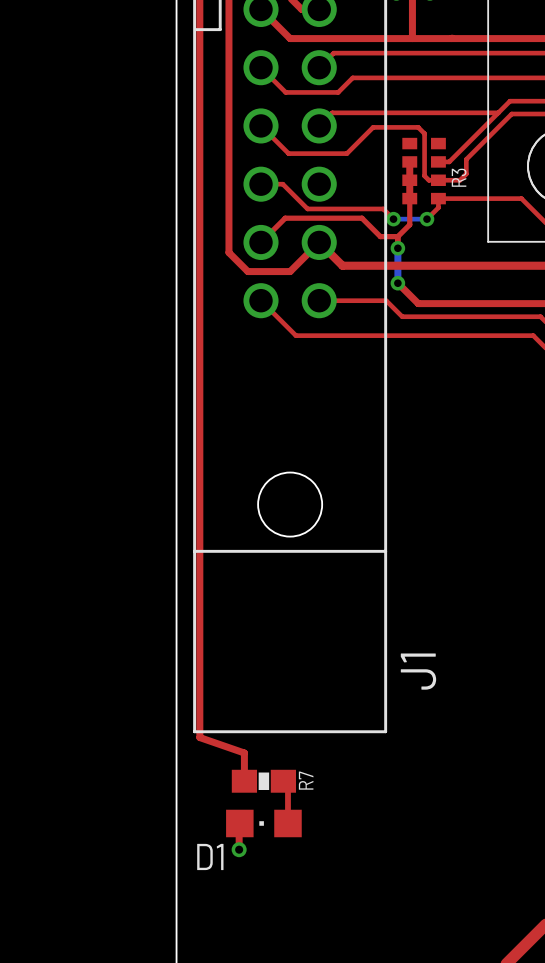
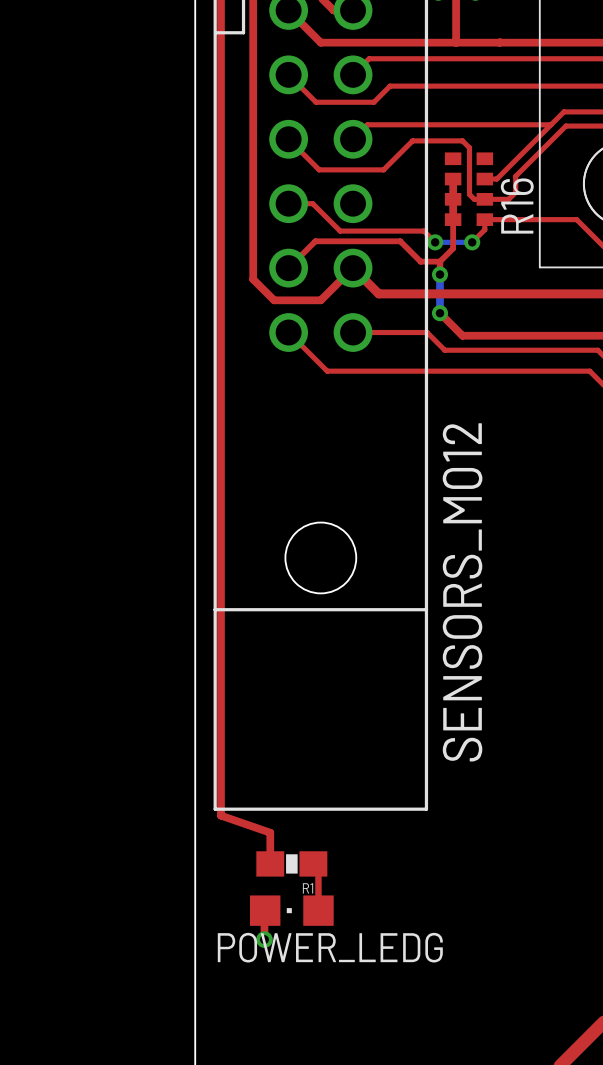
R3 name: R3 (459, 177) -> R16 (517, 206)
J1 name: J1 (418, 671) -> SENSORS_M012 (462, 592)
R7 name: R7 (306, 780) -> R1 (308, 888)
D1 name: D1 (210, 856) -> POWER_LEDG (330, 947)

